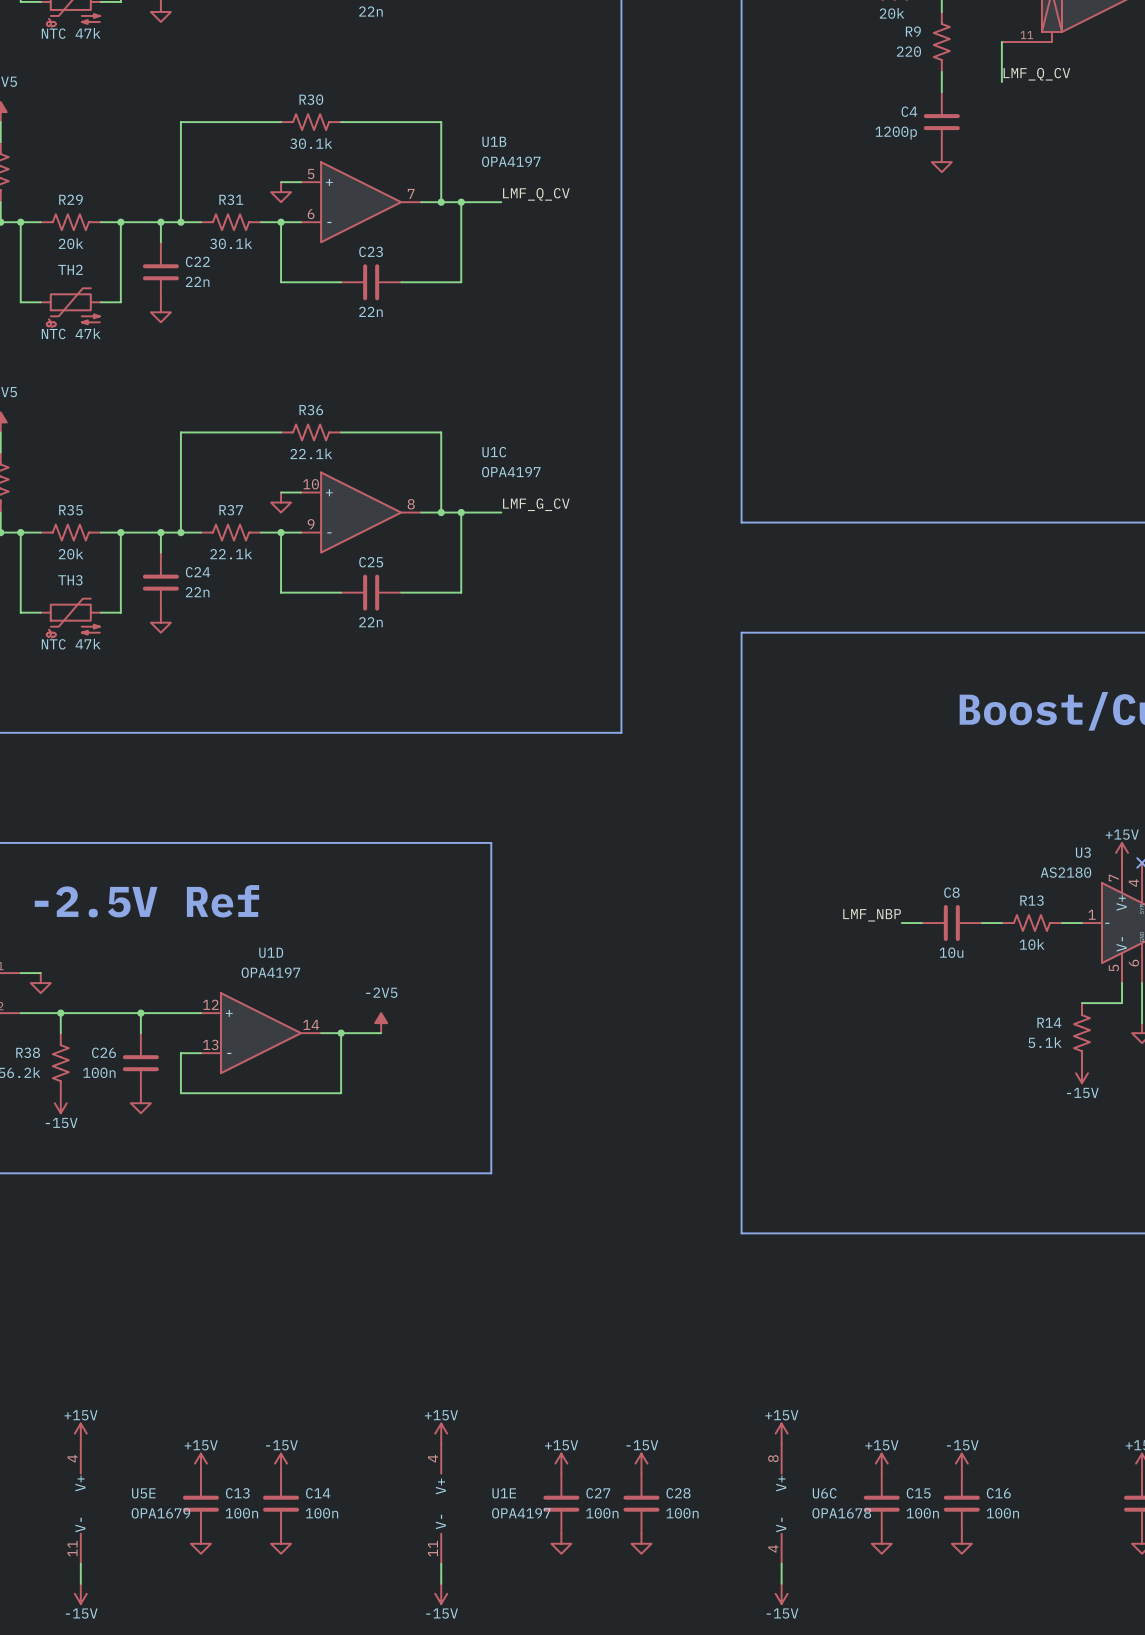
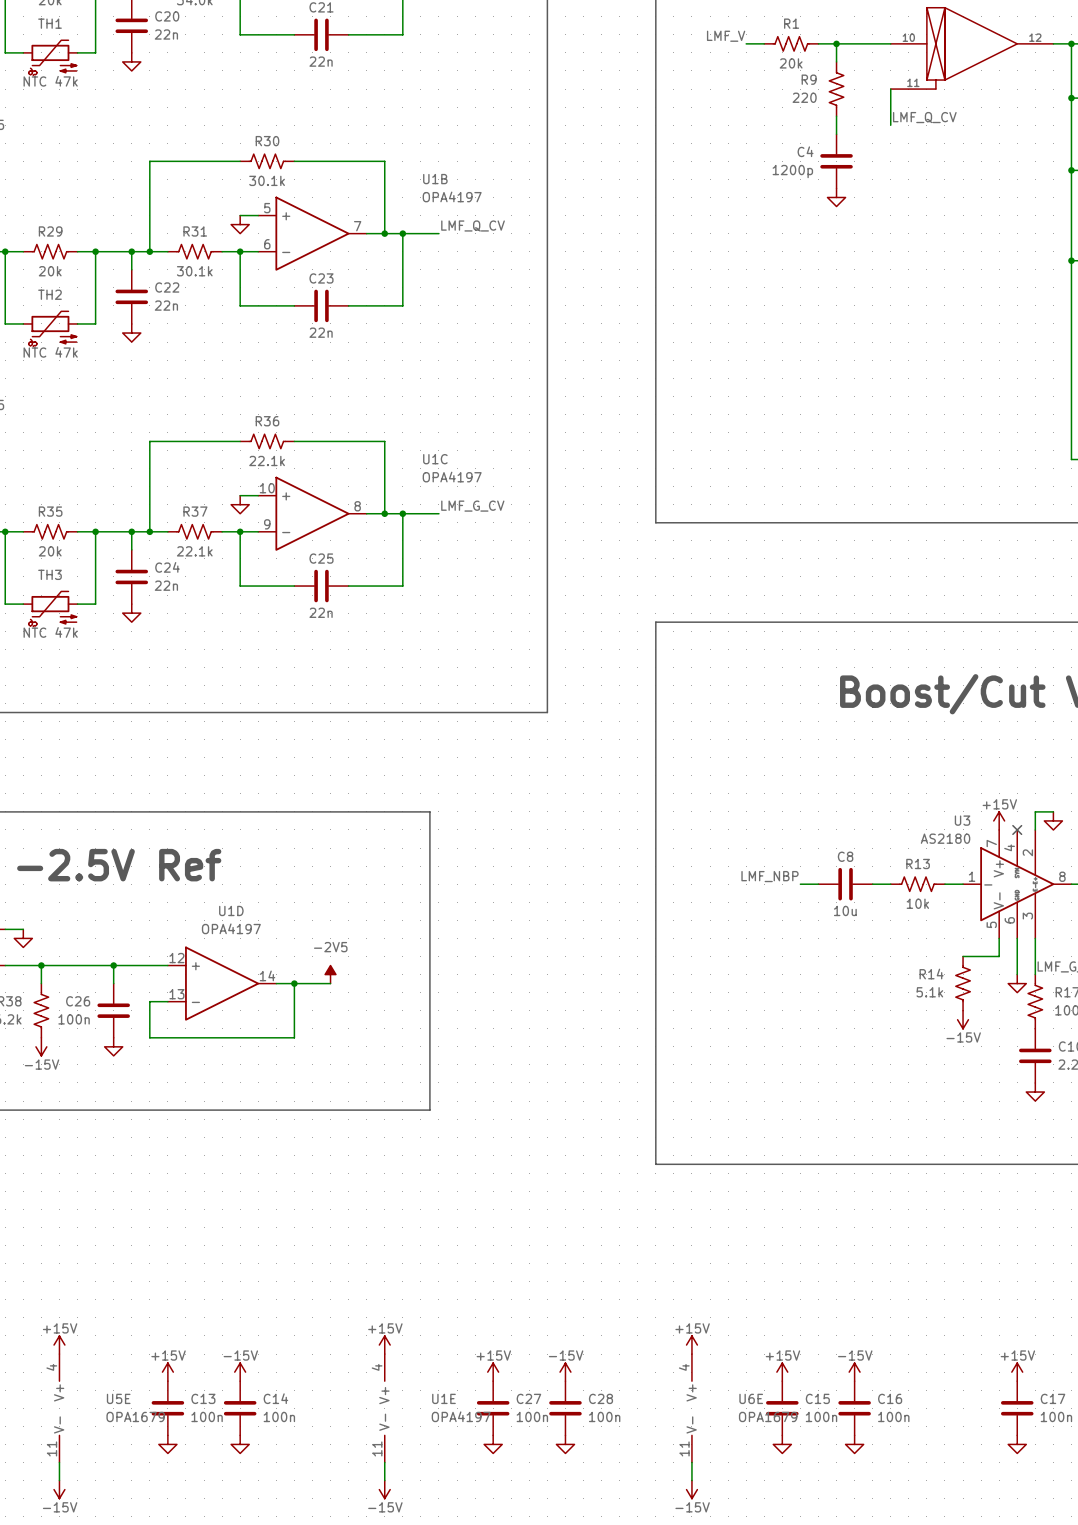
U6C pin number: 8 (773, 1458) -> 4 (684, 1367)
U6C name: U6C (824, 1493) -> U6E (751, 1398)
U6C value: OPA1678 (841, 1513) -> OPA1679 (768, 1416)
U6C pin number: 4 (773, 1548) -> 11 (684, 1448)

